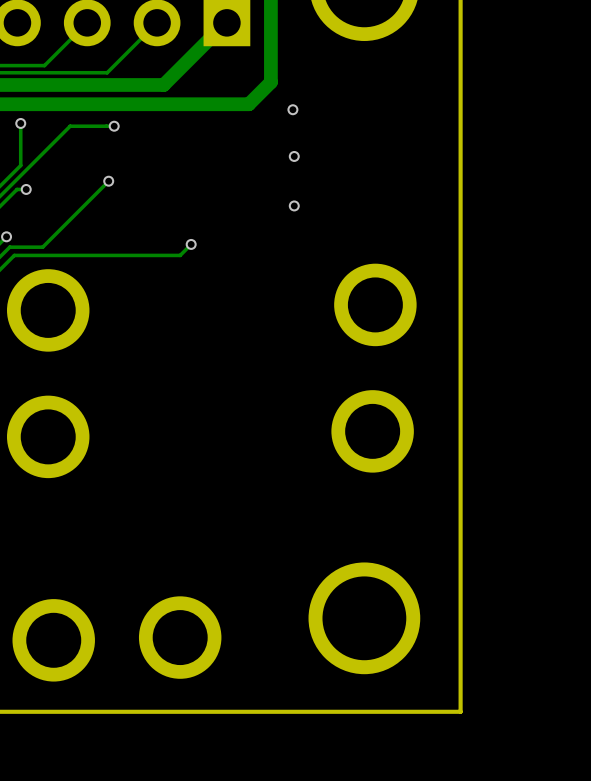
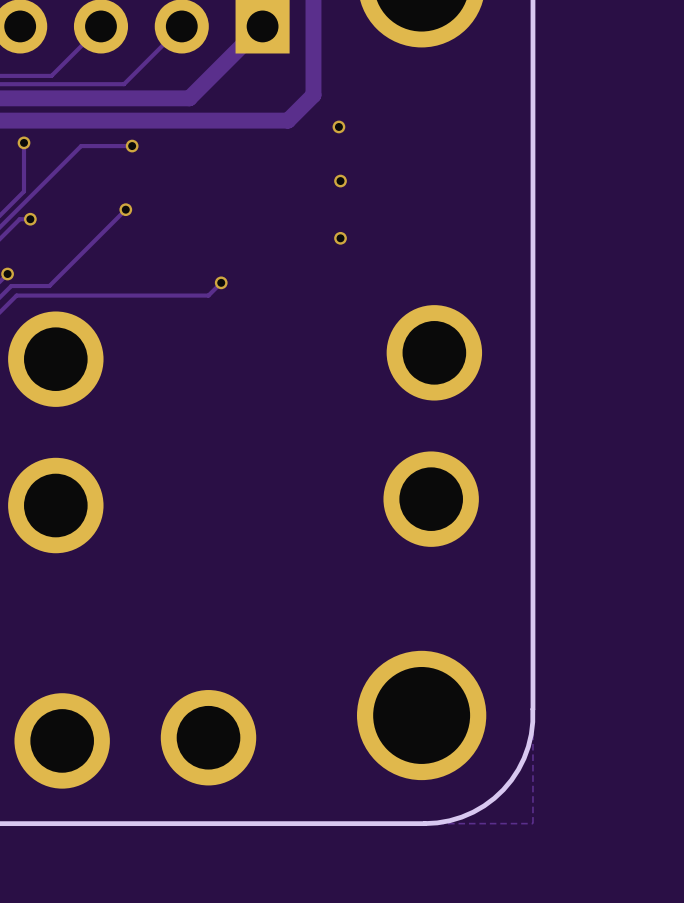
board edge: (460, 612) (460, 711) (367, 711) -> (532, 709) (531, 734) (524, 758) (503, 789) (473, 812) (449, 820) (424, 823)

